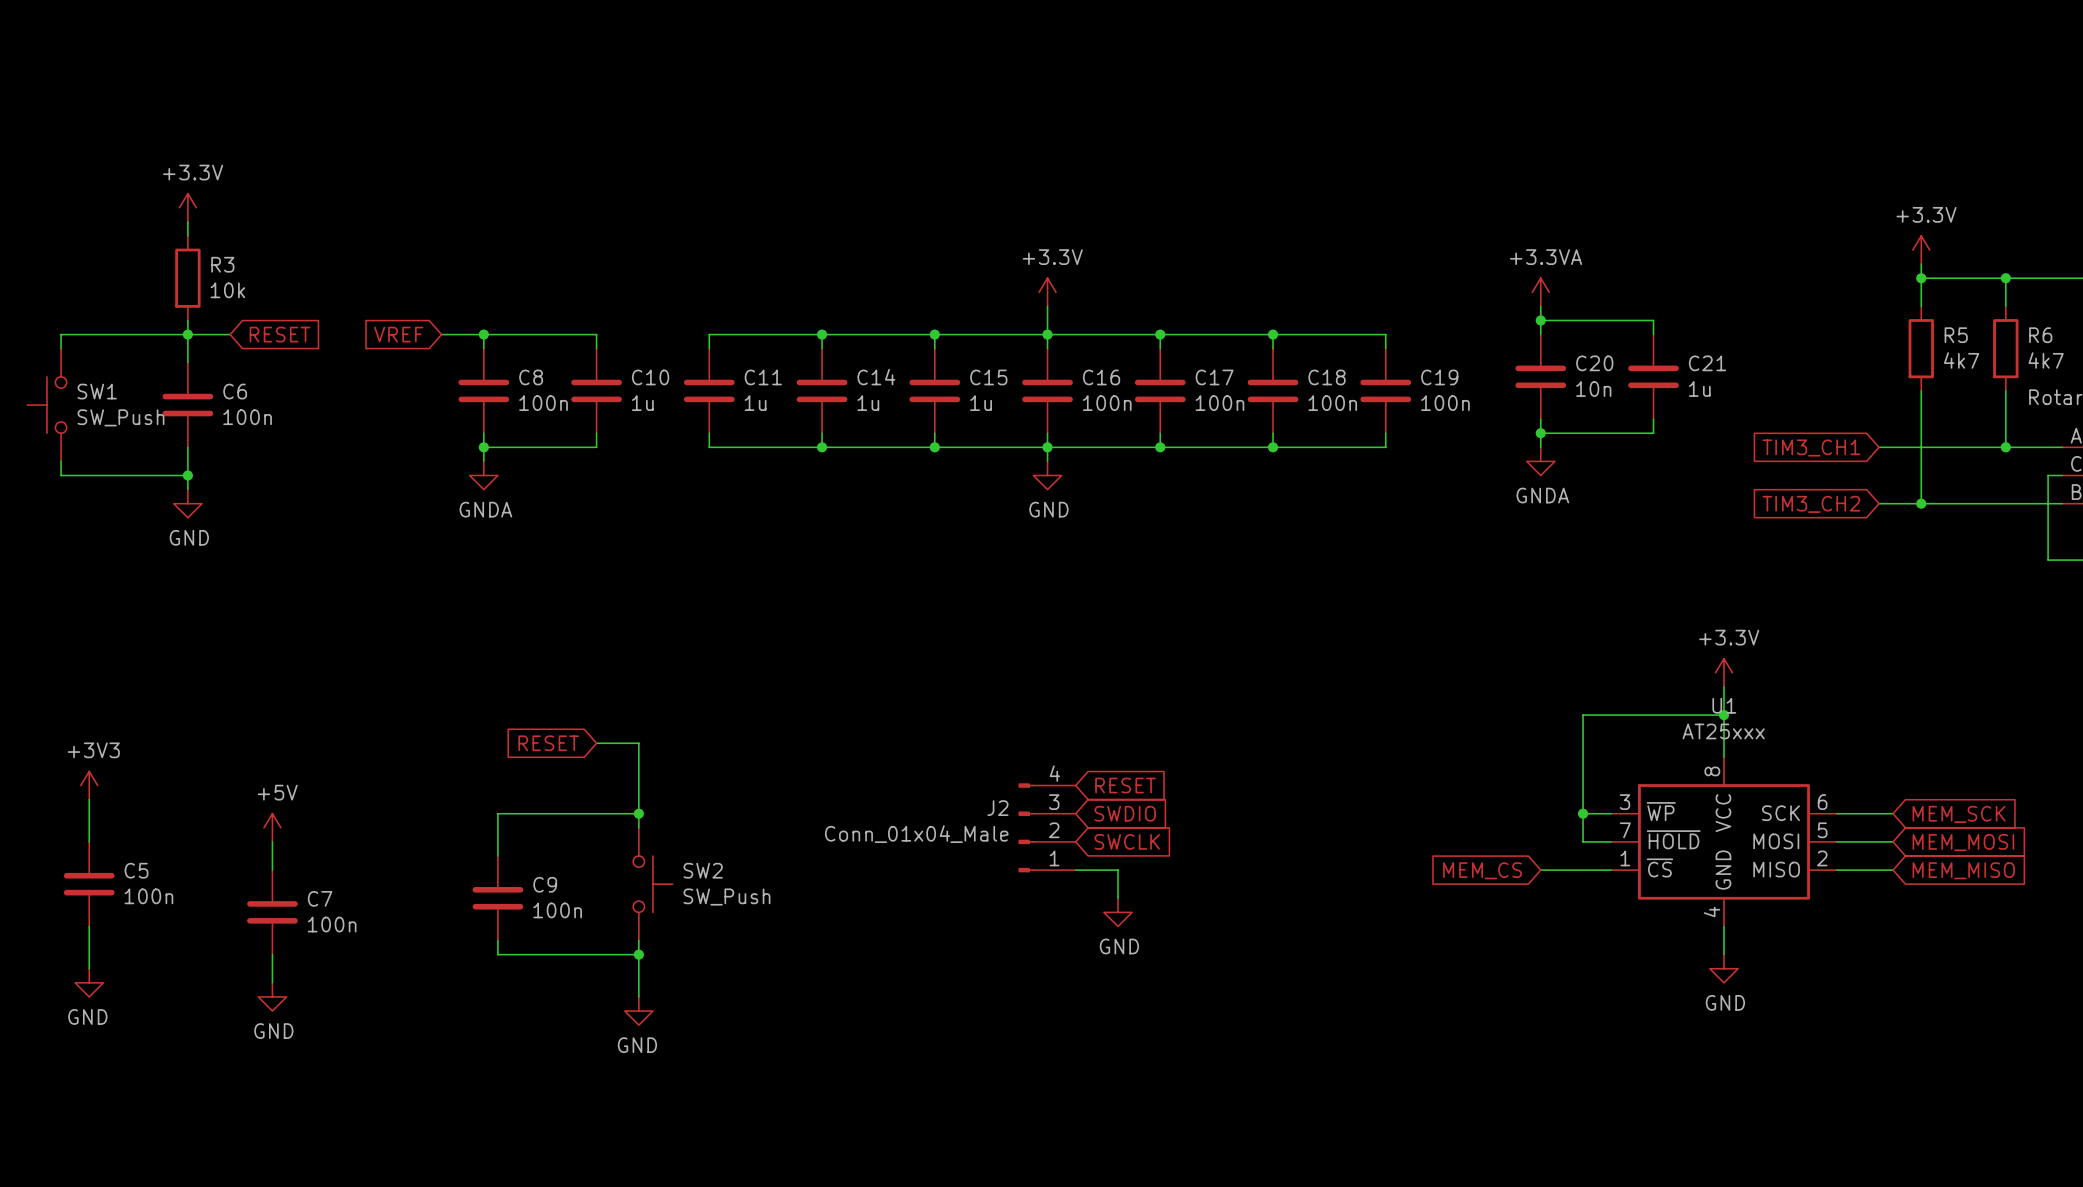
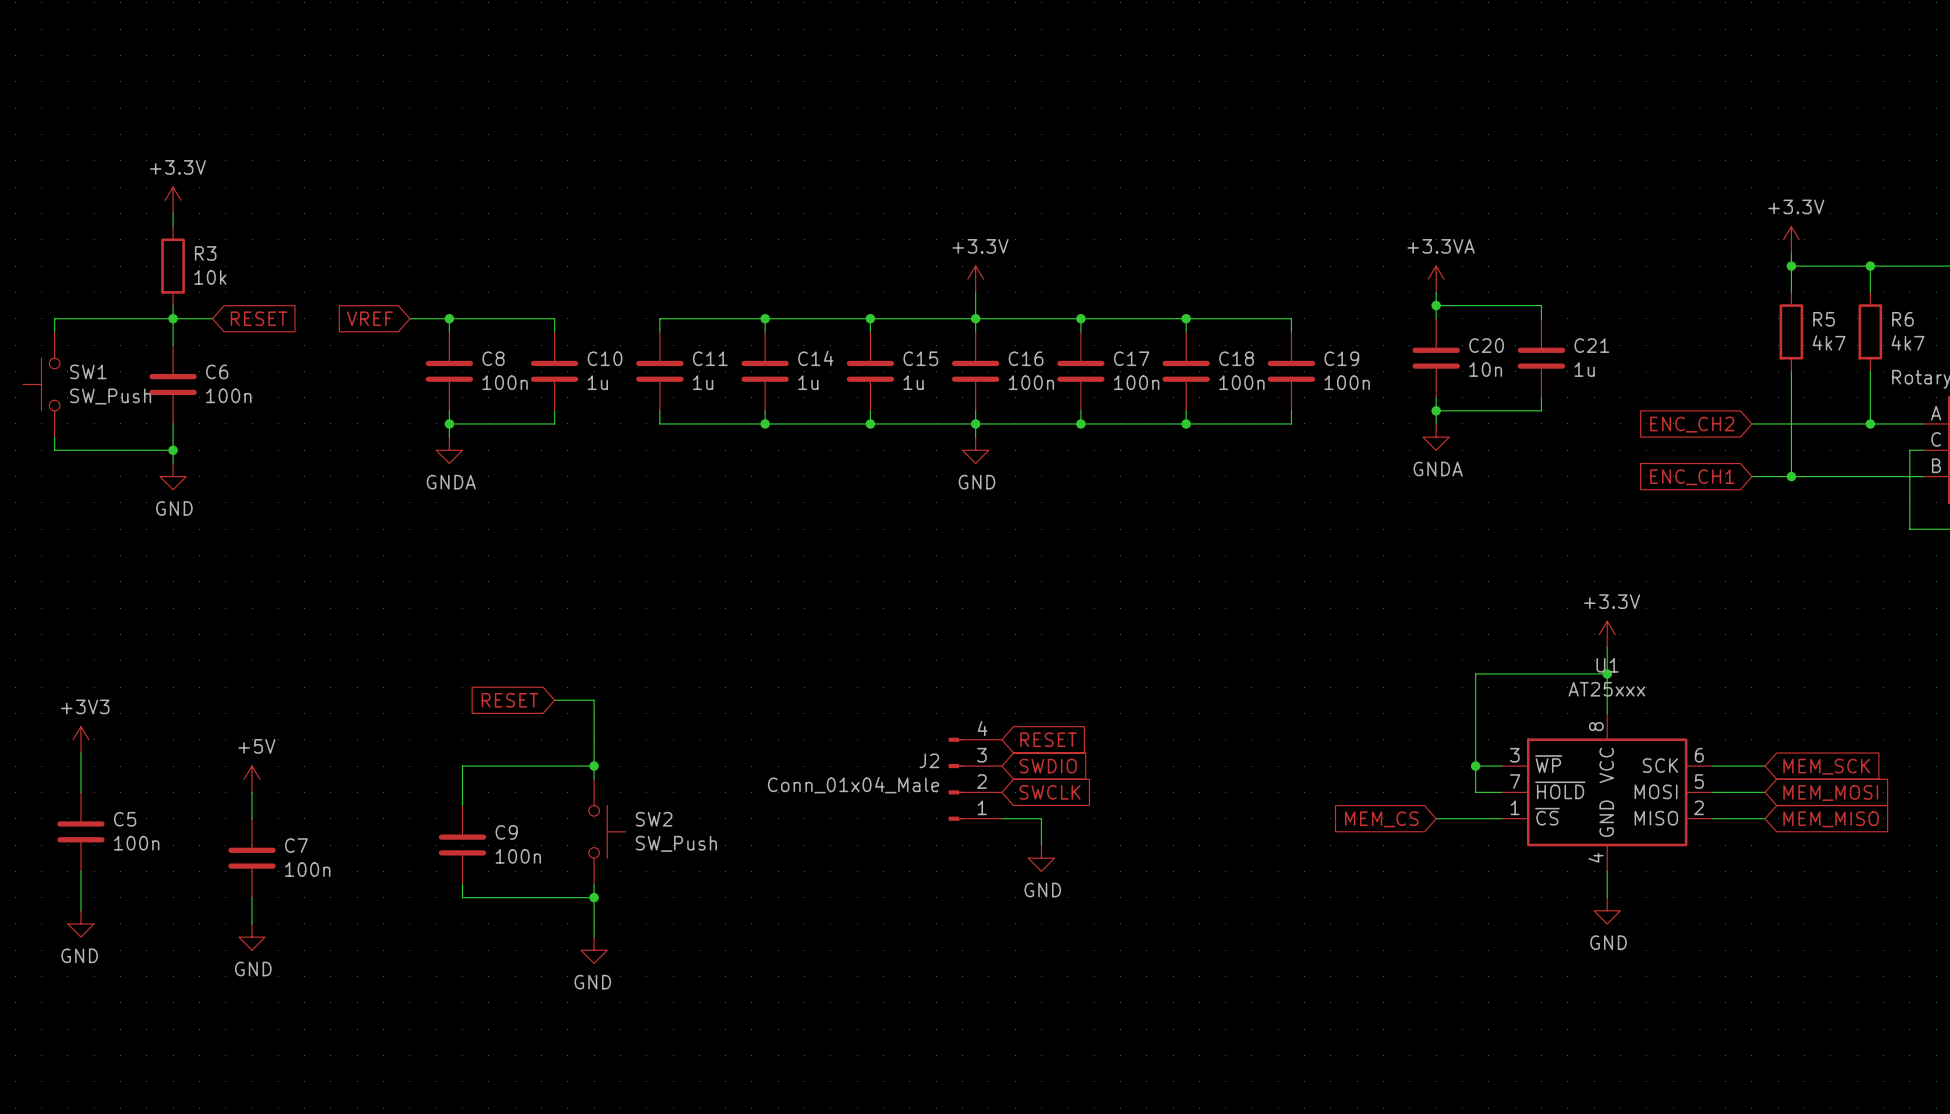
global label: TIM3_CH1 (1811, 447) -> ENC_CH2 (1692, 424)
global label: TIM3_CH2 (1811, 504) -> ENC_CH1 (1692, 477)

